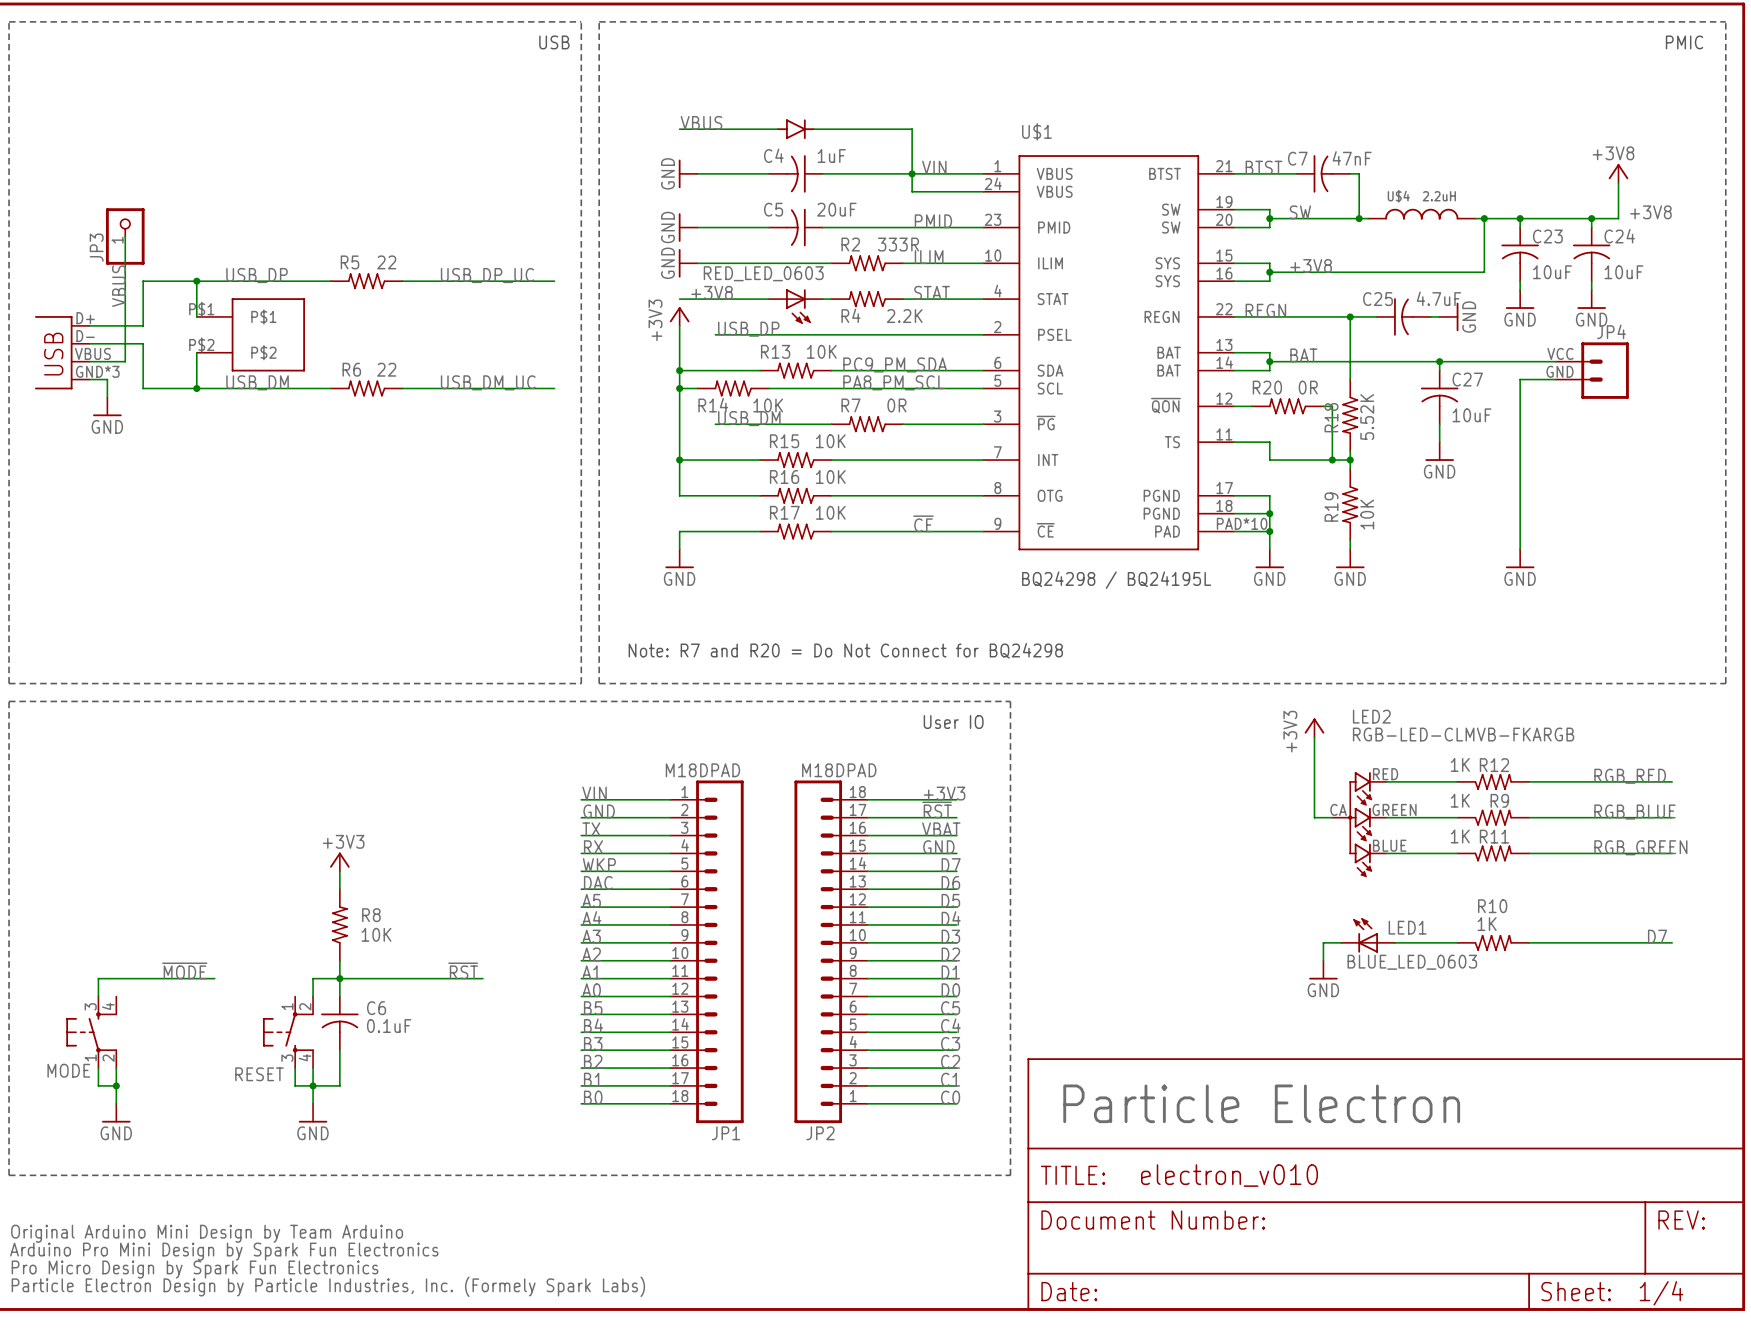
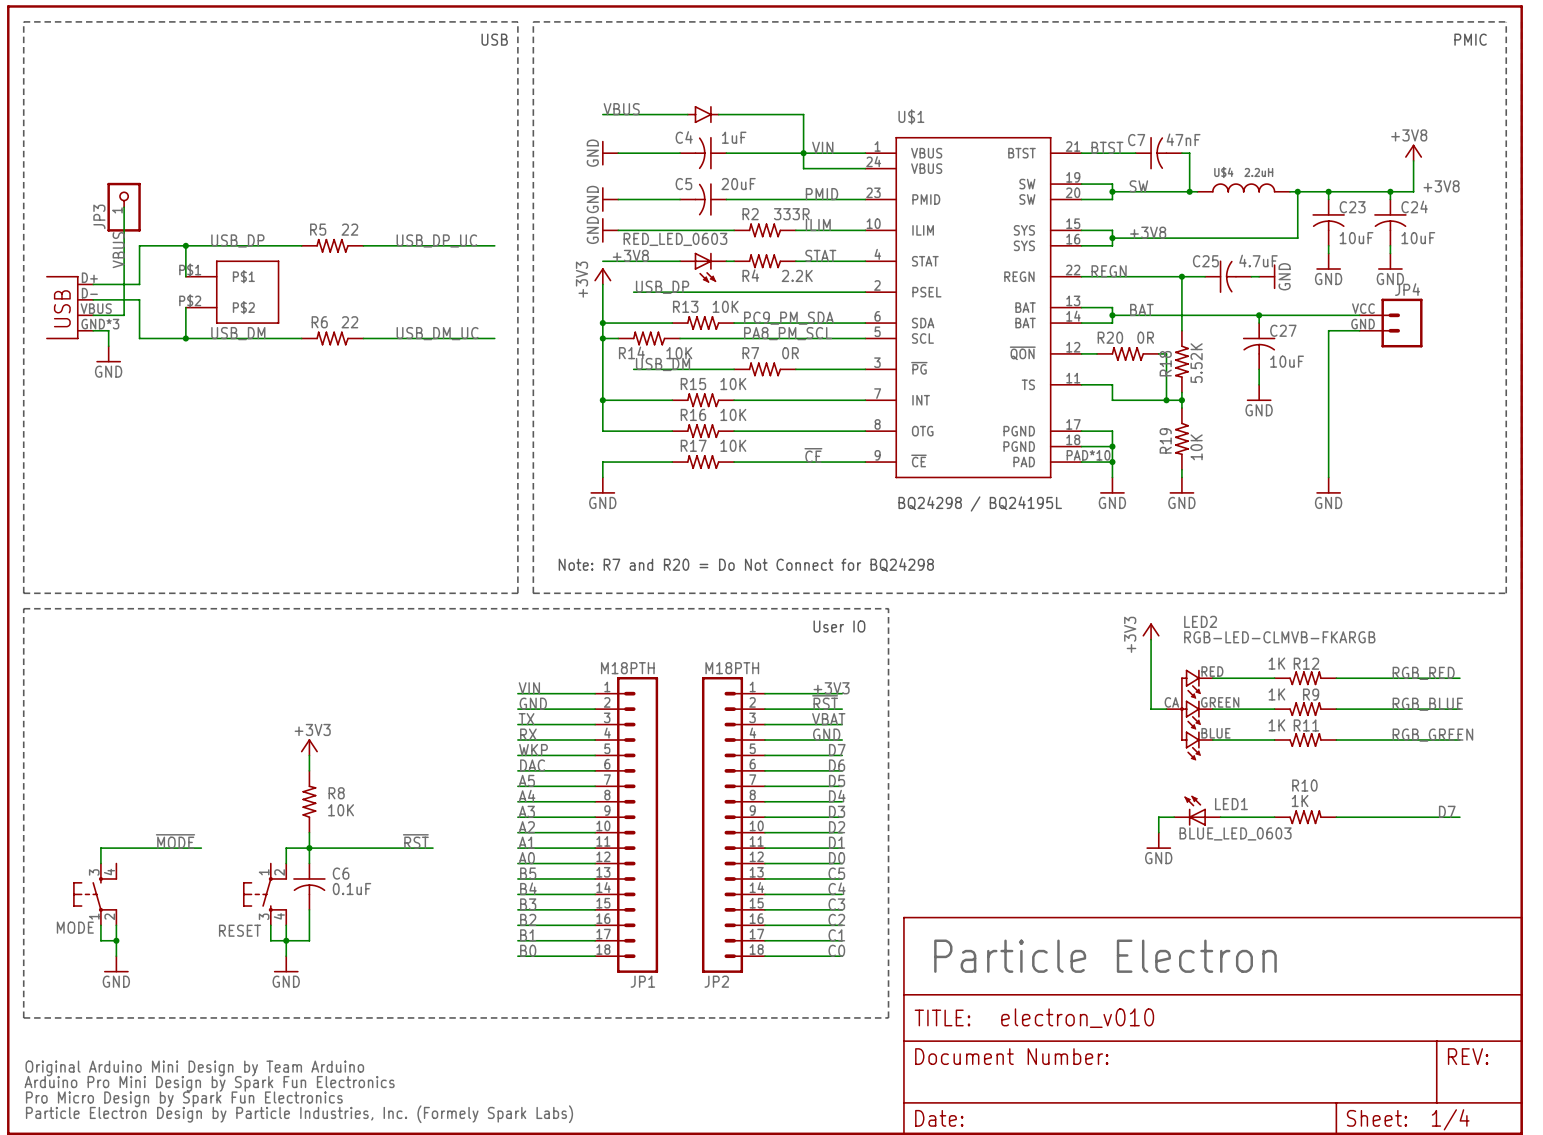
JP1 value: M18DPAD (702, 770) -> M18PTH (627, 668)
JP2 value: M18DPAD (839, 770) -> M18PTH (732, 668)
JP2 flip: as is (818, 951) -> up-down (722, 824)

